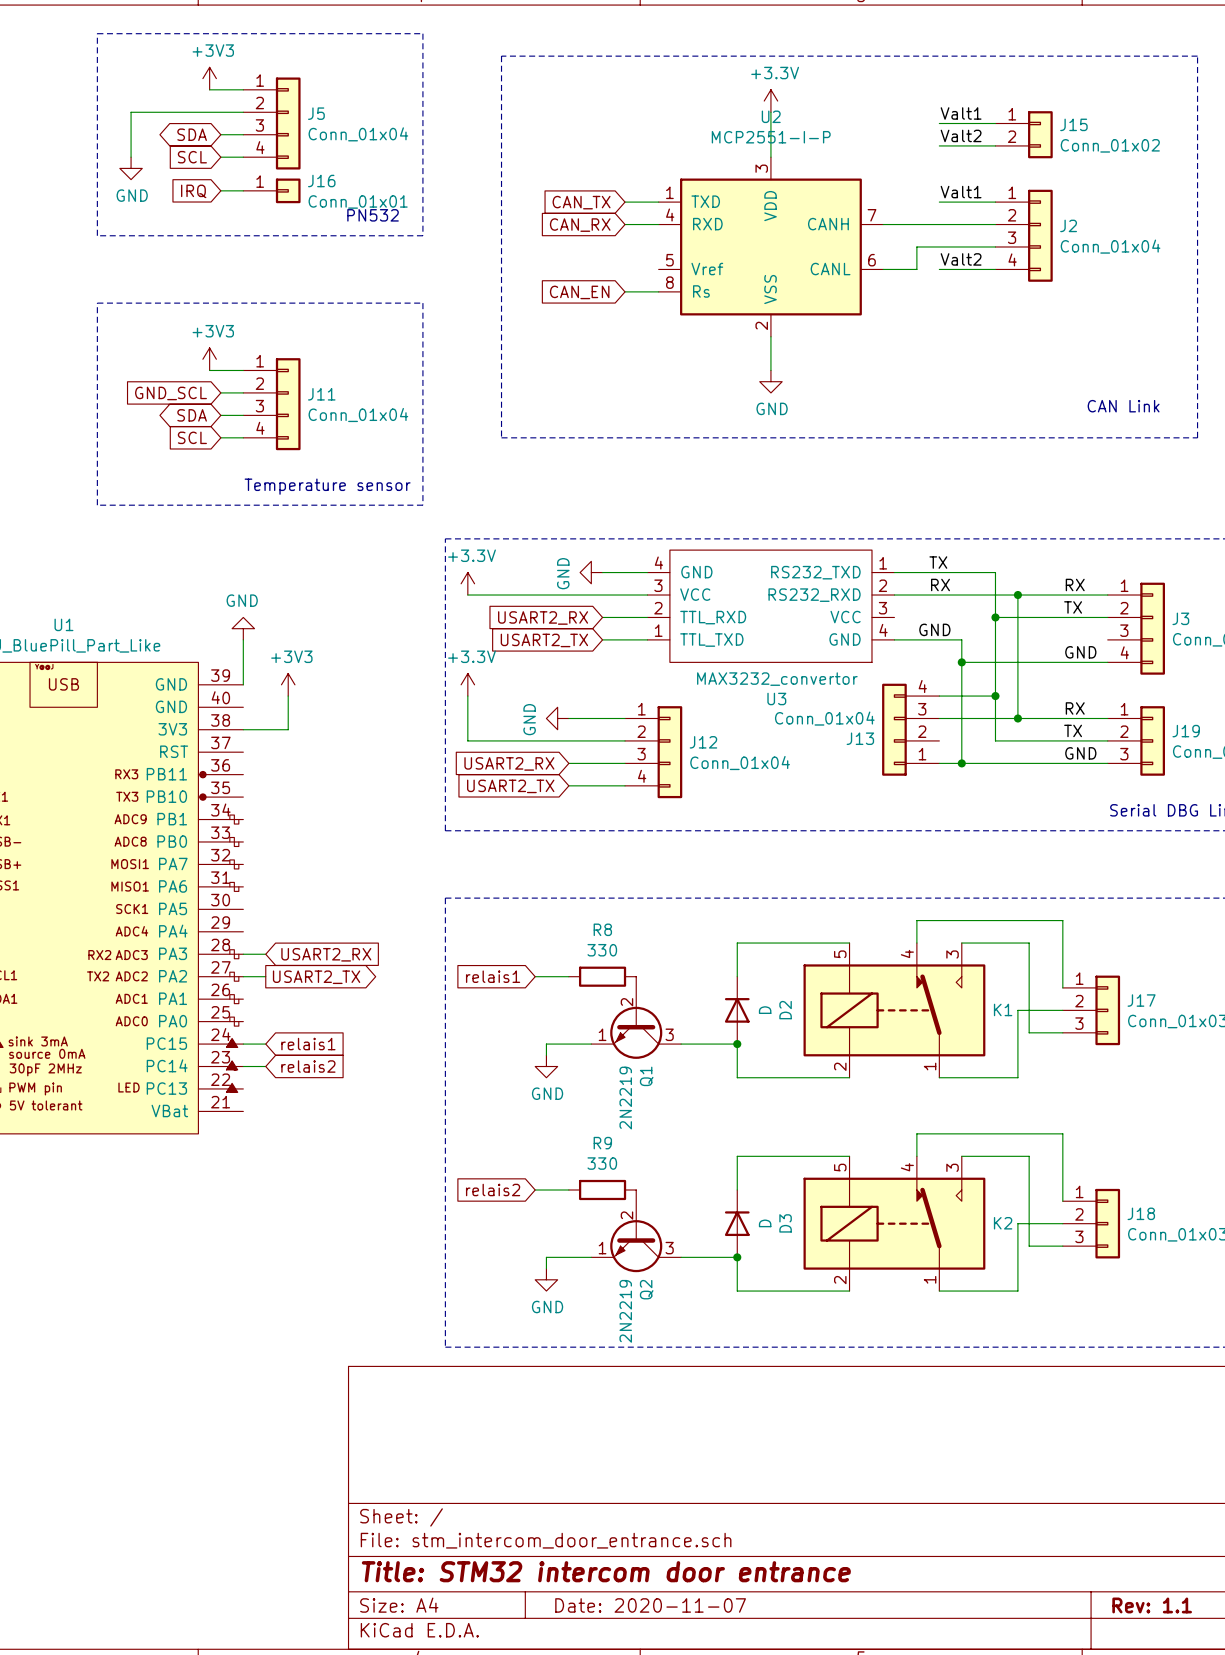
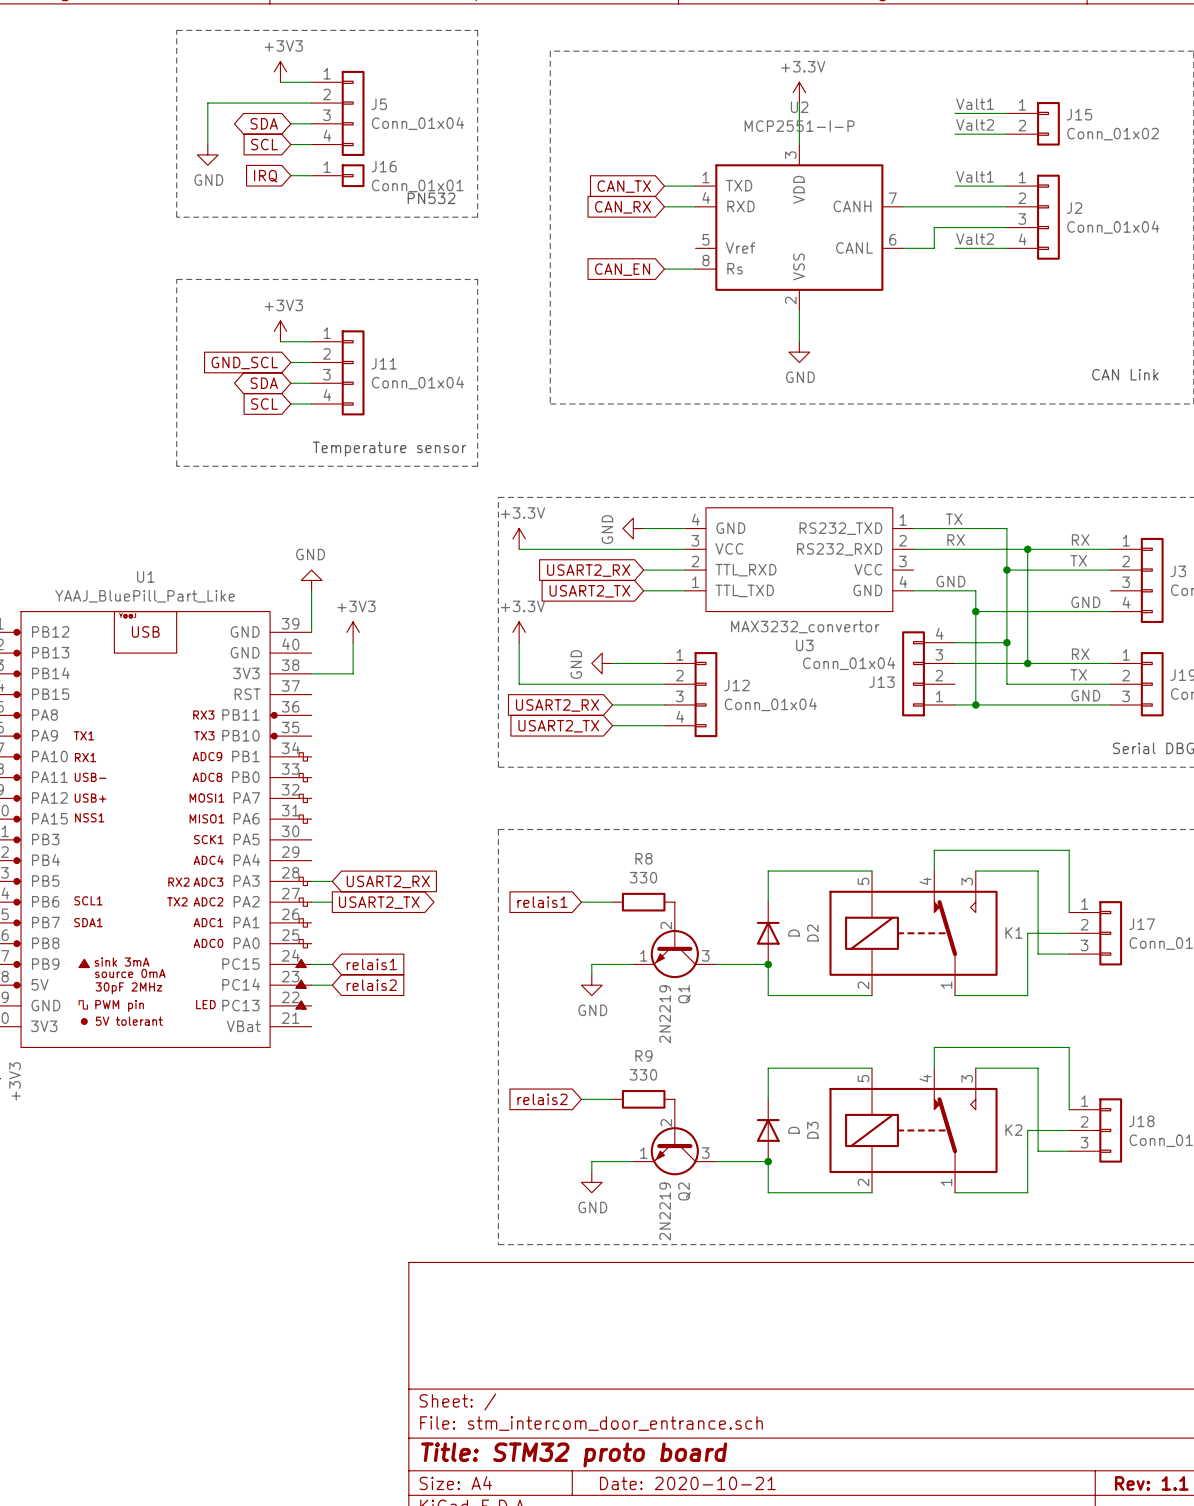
title block: Title: STM32 intercom door entrance (606, 1571) -> Title: STM32 proto board (574, 1454)
title block: Date: 2020-11-07 (650, 1605) -> Date: 2020-10-21 (687, 1483)

